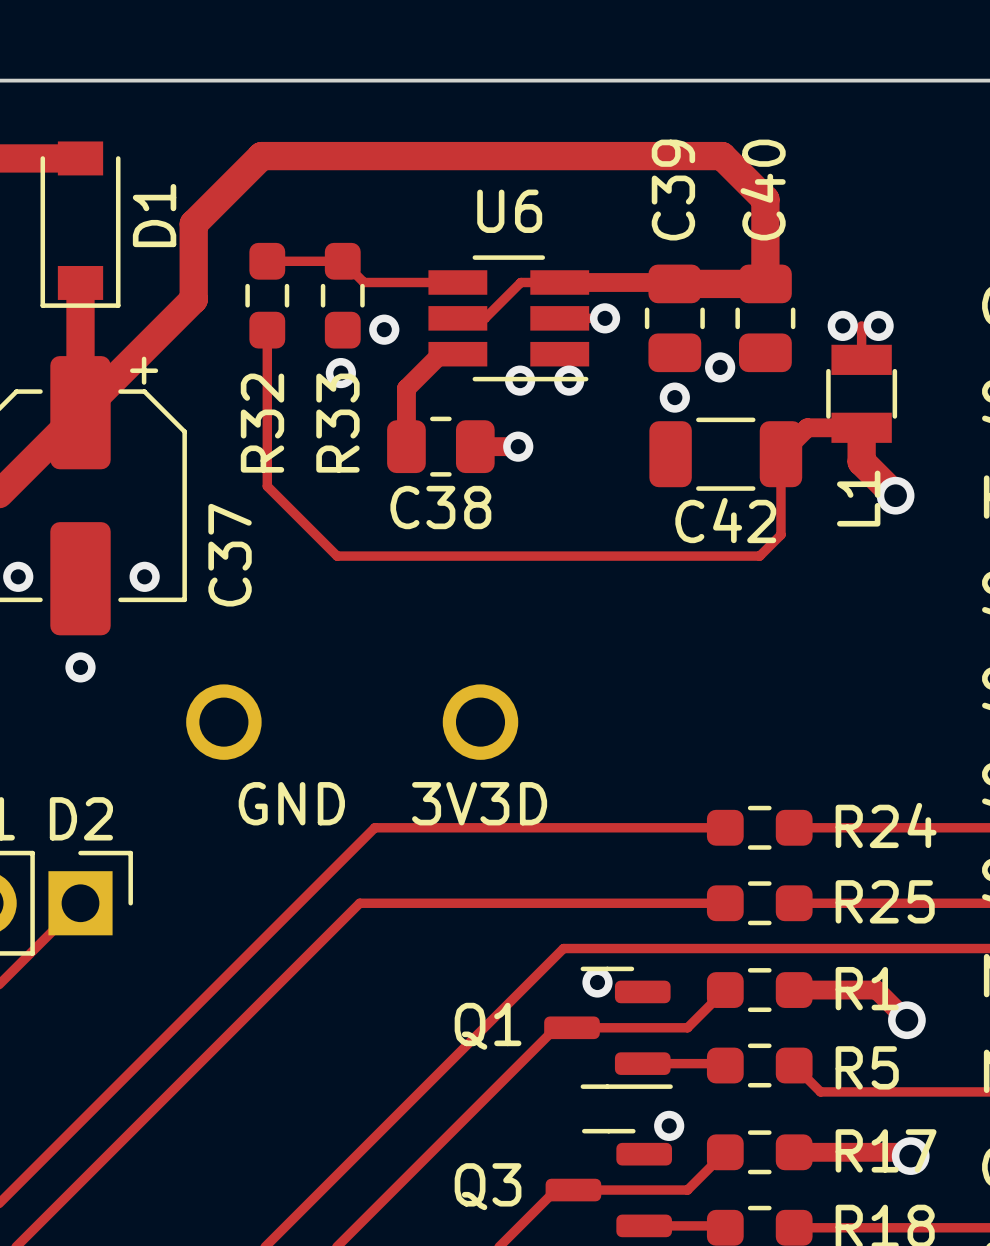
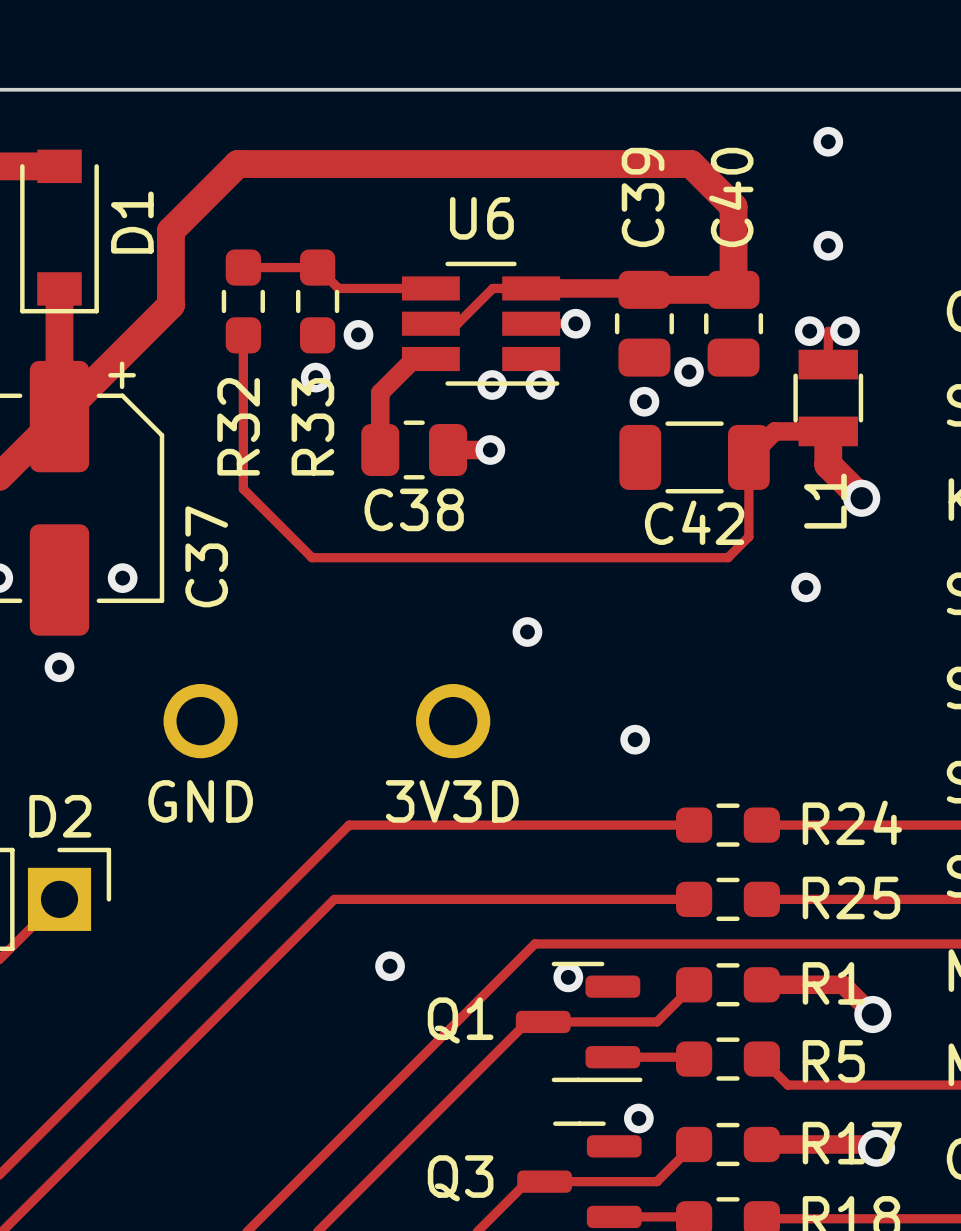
via: none -> (828, 141)
via: none -> (828, 245)
via: none -> (805, 587)
via: none -> (527, 631)
via: none -> (635, 739)
text position: GND (291, 803) -> GND (200, 801)
via: none -> (390, 966)

